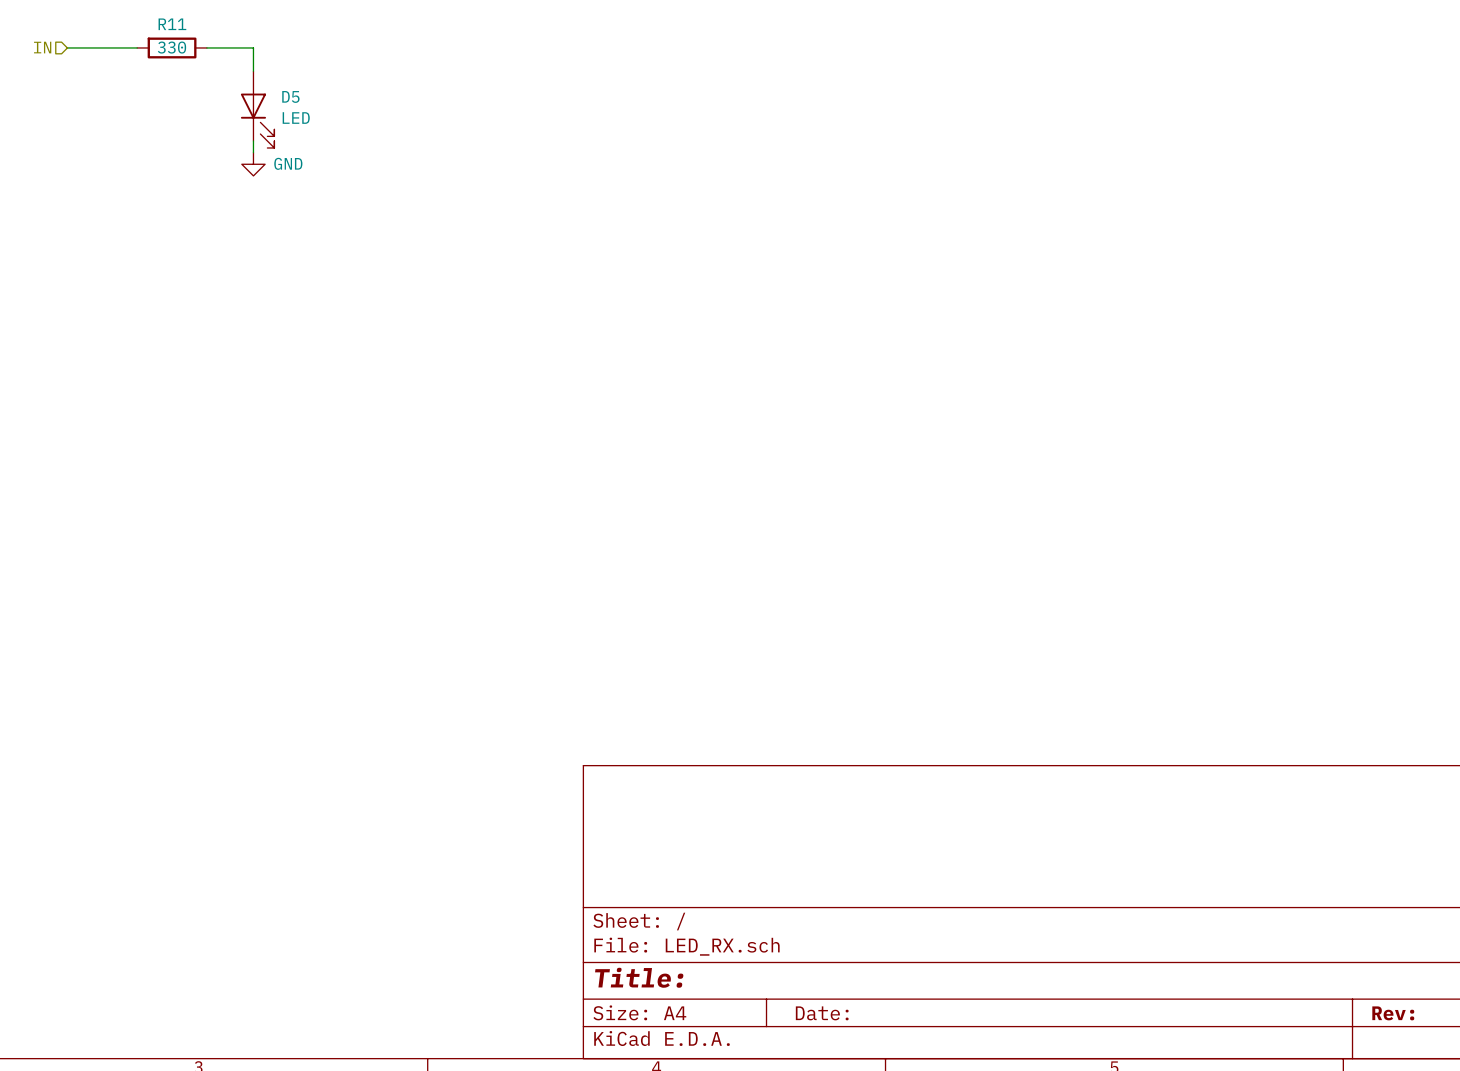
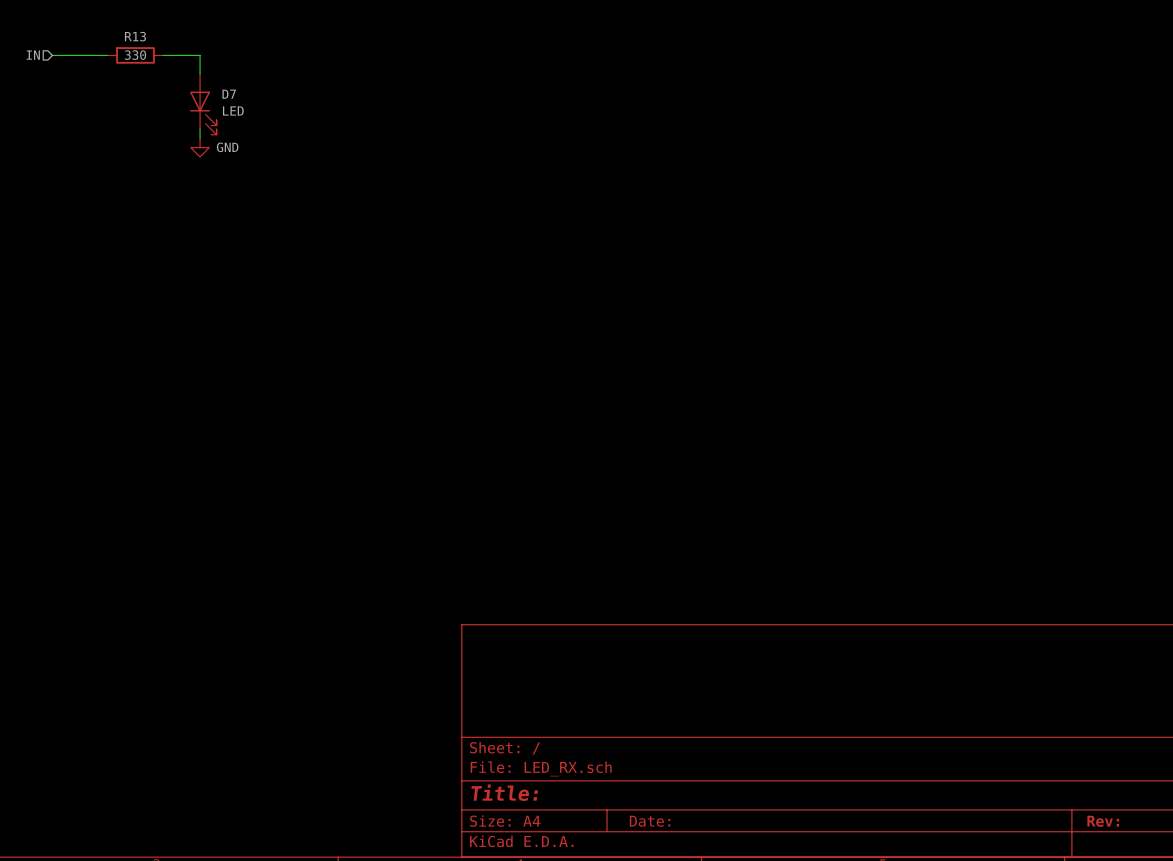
R11 name: R11 (172, 24) -> R13 (135, 36)
D5 name: D5 (290, 96) -> D7 (229, 94)

